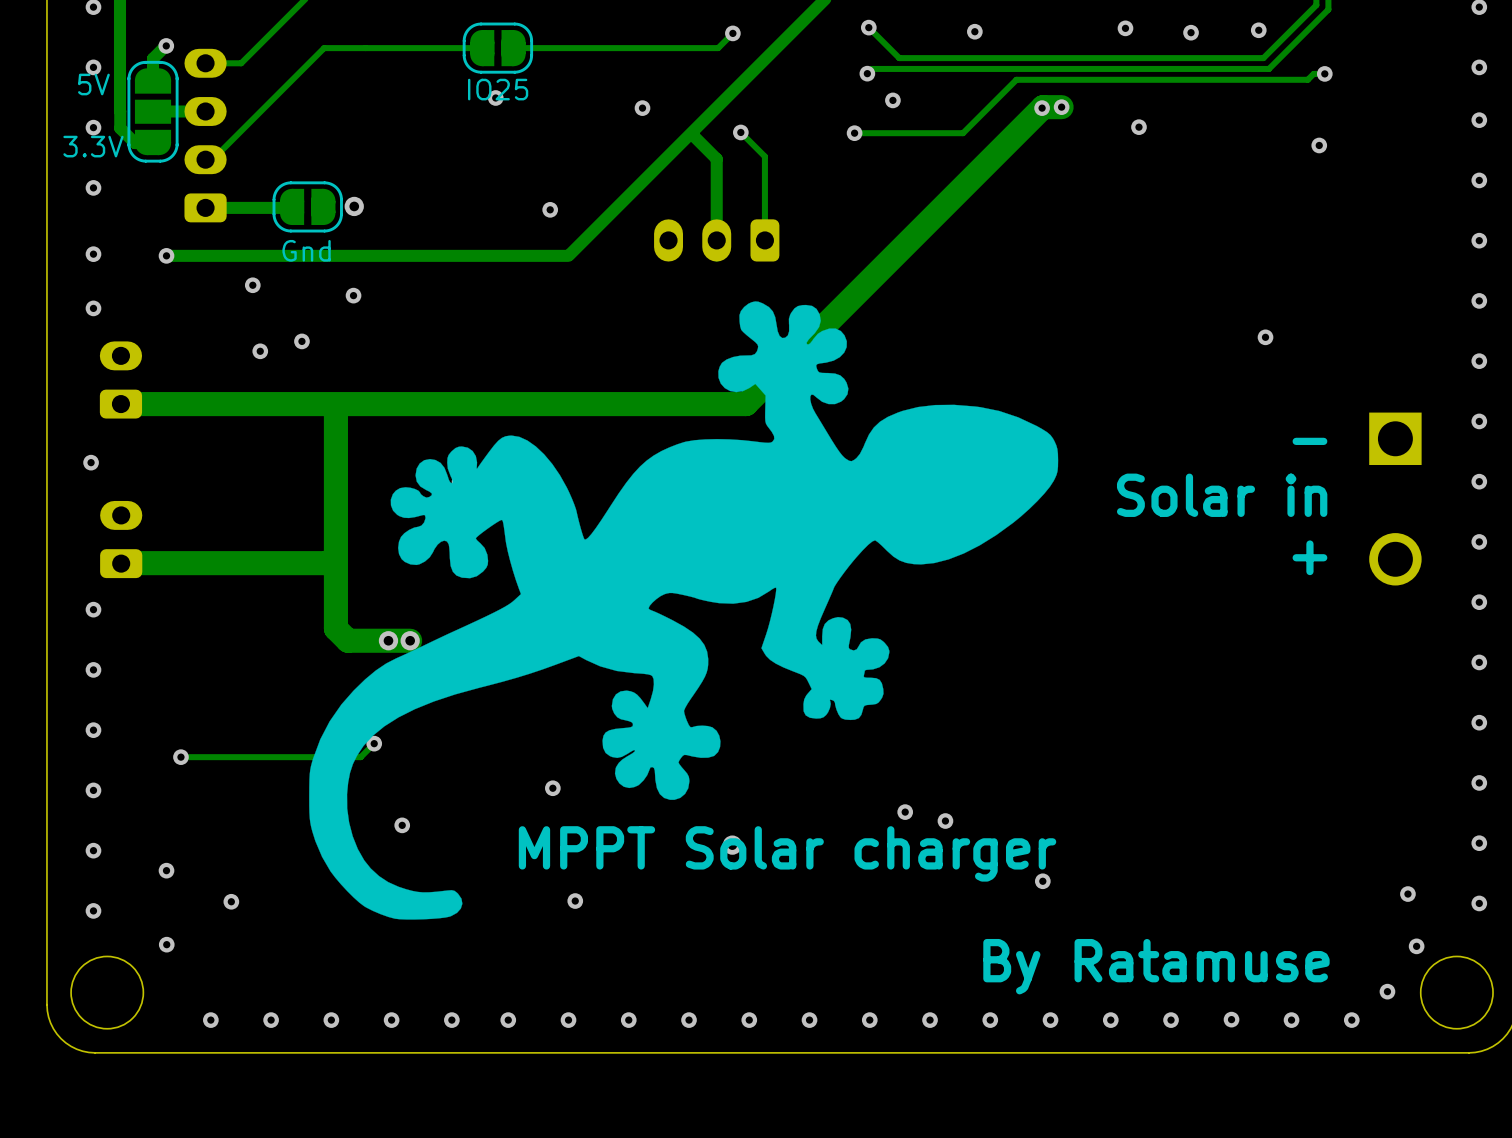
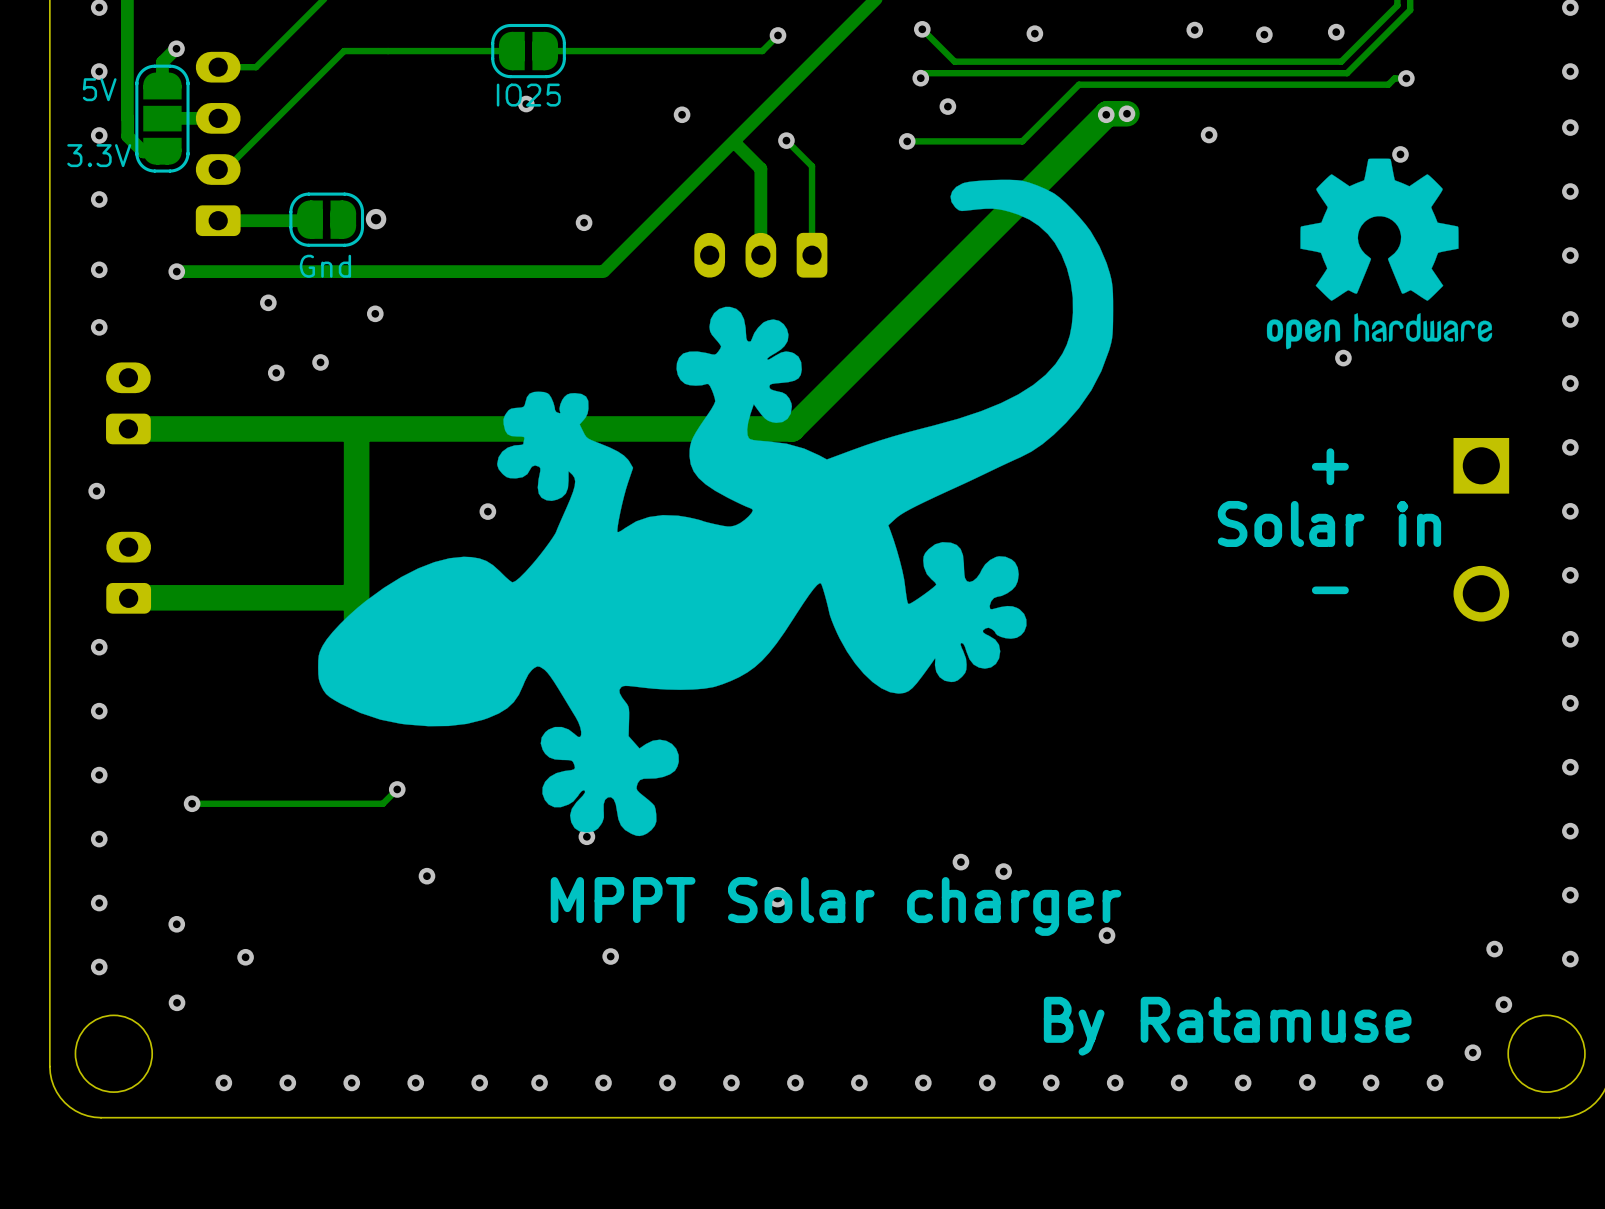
drawing: none -> [1266, 158, 1493, 350]
drawing: none -> [318, 179, 1114, 837]
drawing: [309, 301, 1059, 920] -> none
text position: - (1309, 441) -> - (1330, 590)
text position: Solar in (1222, 495) -> Solar in (1329, 523)
text position: + (1309, 557) -> + (1330, 466)

